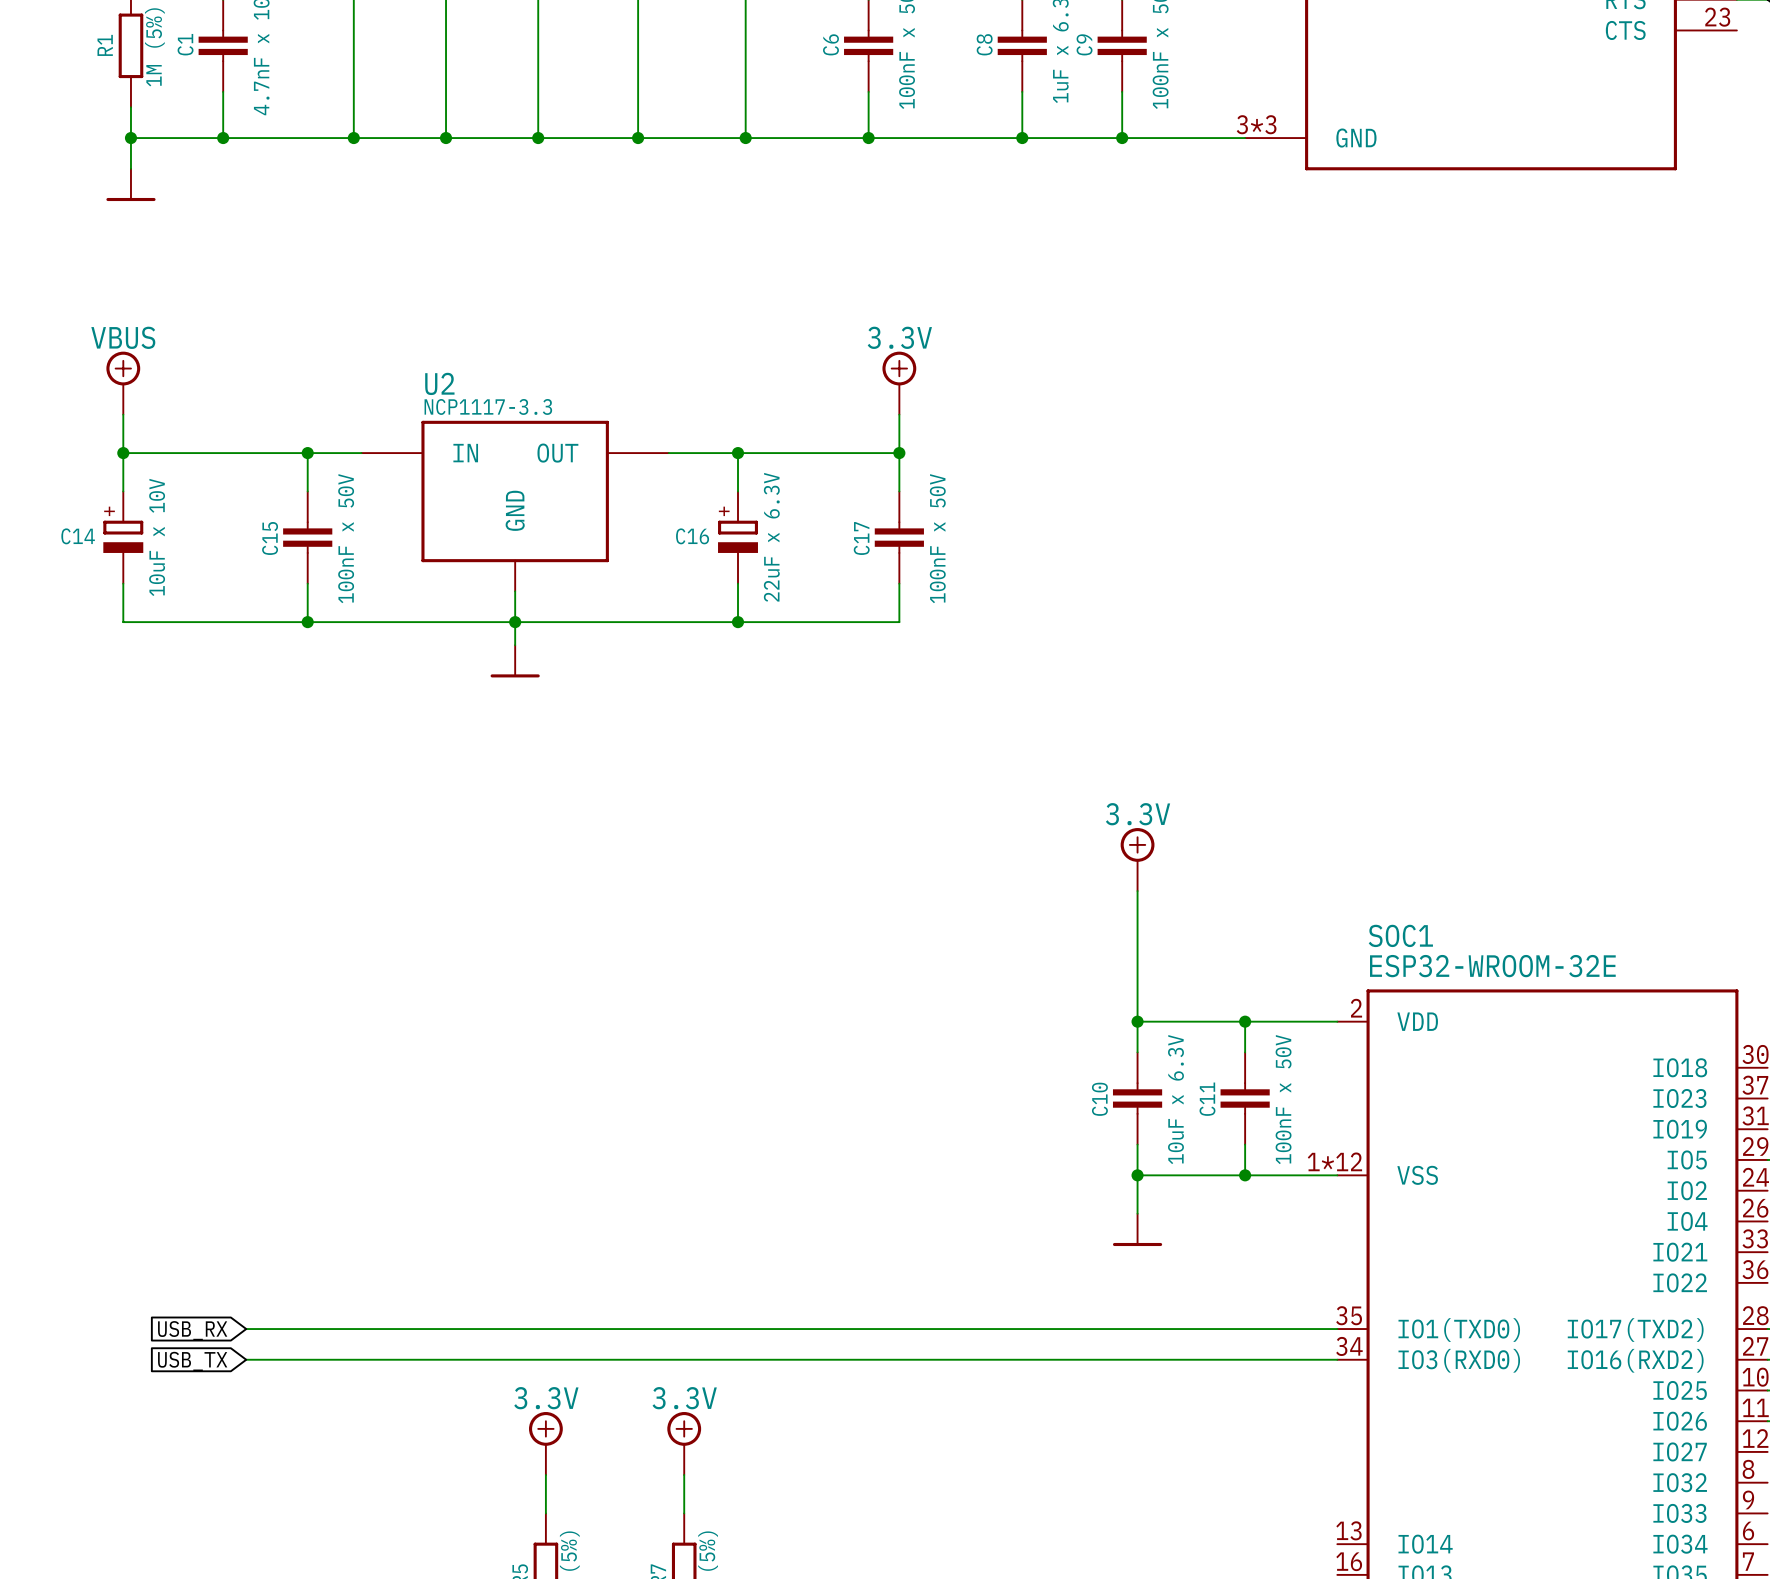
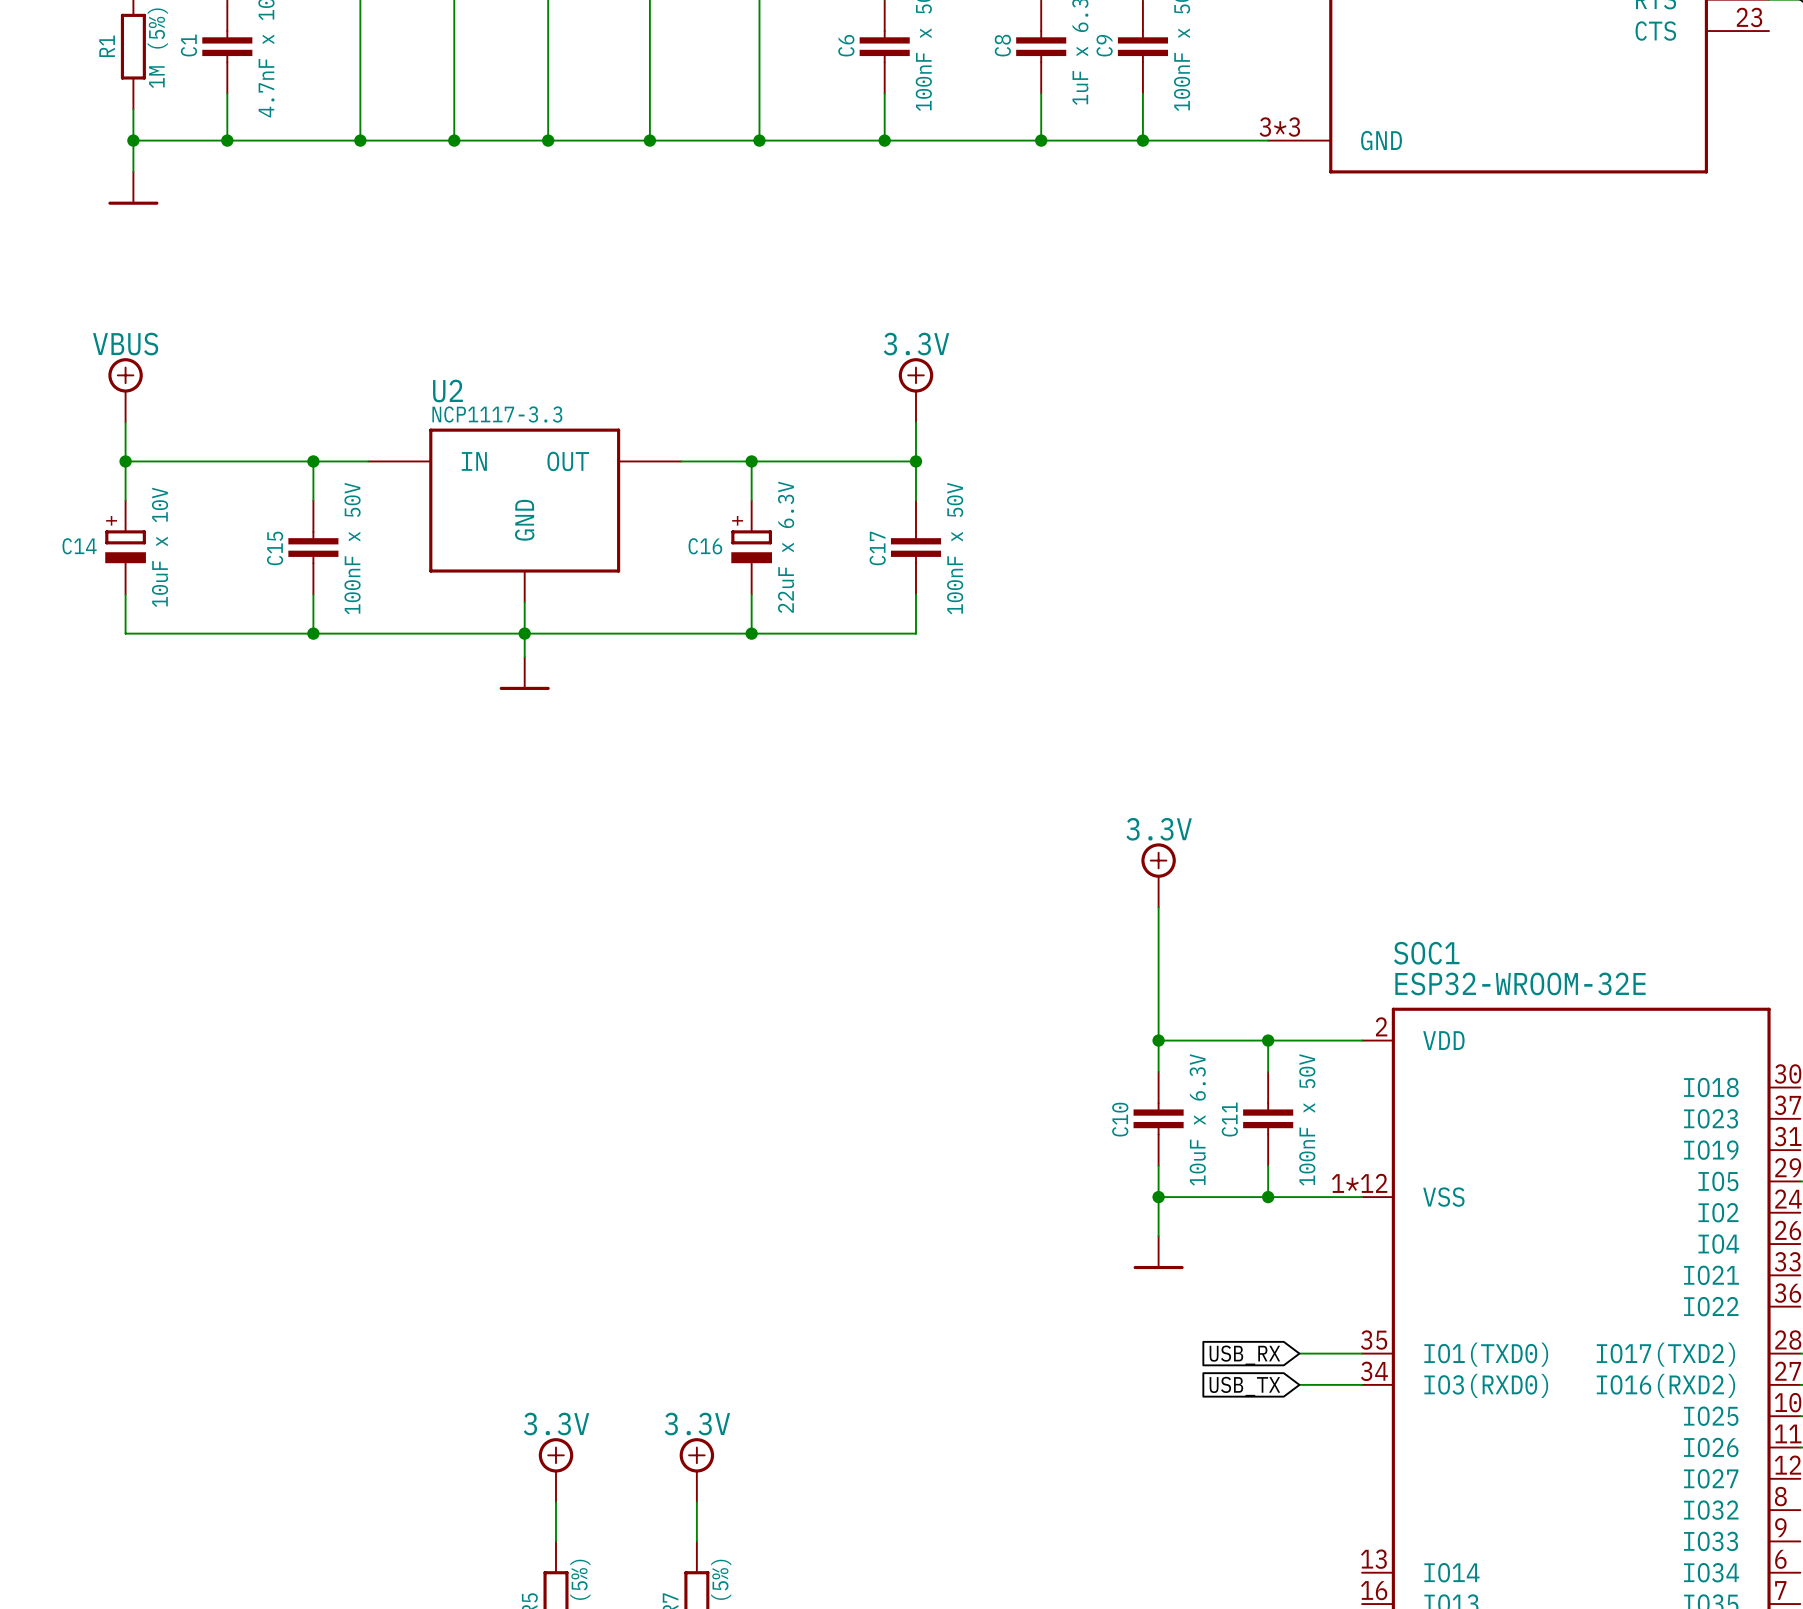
wire: (246, 1329) (1275, 1329) -> none
global label: USB_RX (192, 1330) -> none
global label: none -> USB_RX (1244, 1355)
wire: (246, 1359) (1275, 1359) -> none
global label: USB_TX (192, 1361) -> none
global label: none -> USB_TX (1244, 1386)

